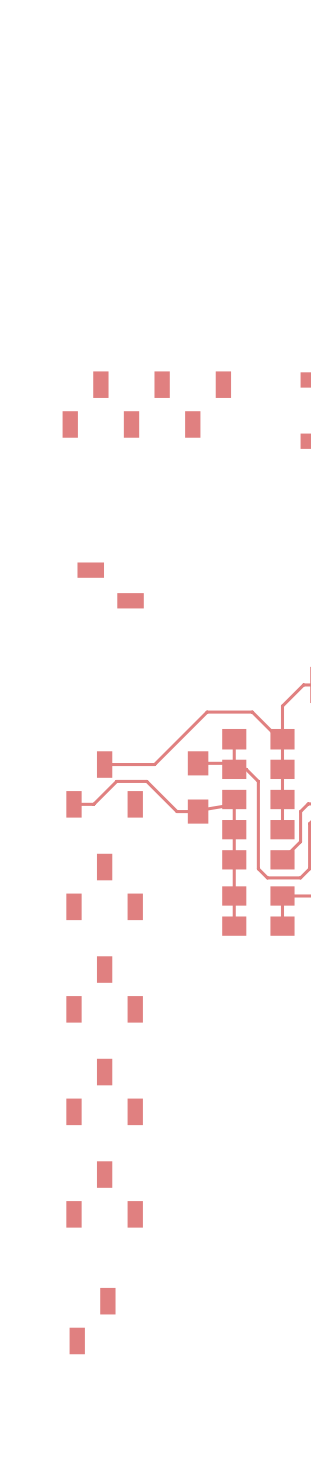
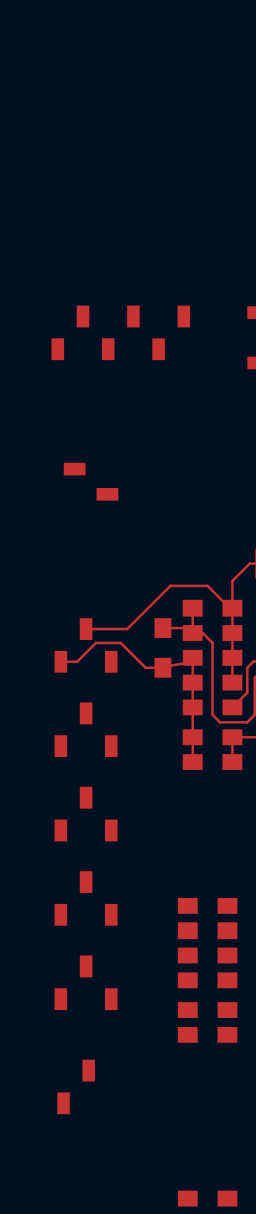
part: none -> (207, 905)
part: none -> (207, 930)
part: none -> (207, 955)
part: none -> (207, 980)
part: none -> (207, 1010)
part: none -> (207, 1034)
part: none -> (207, 1198)

